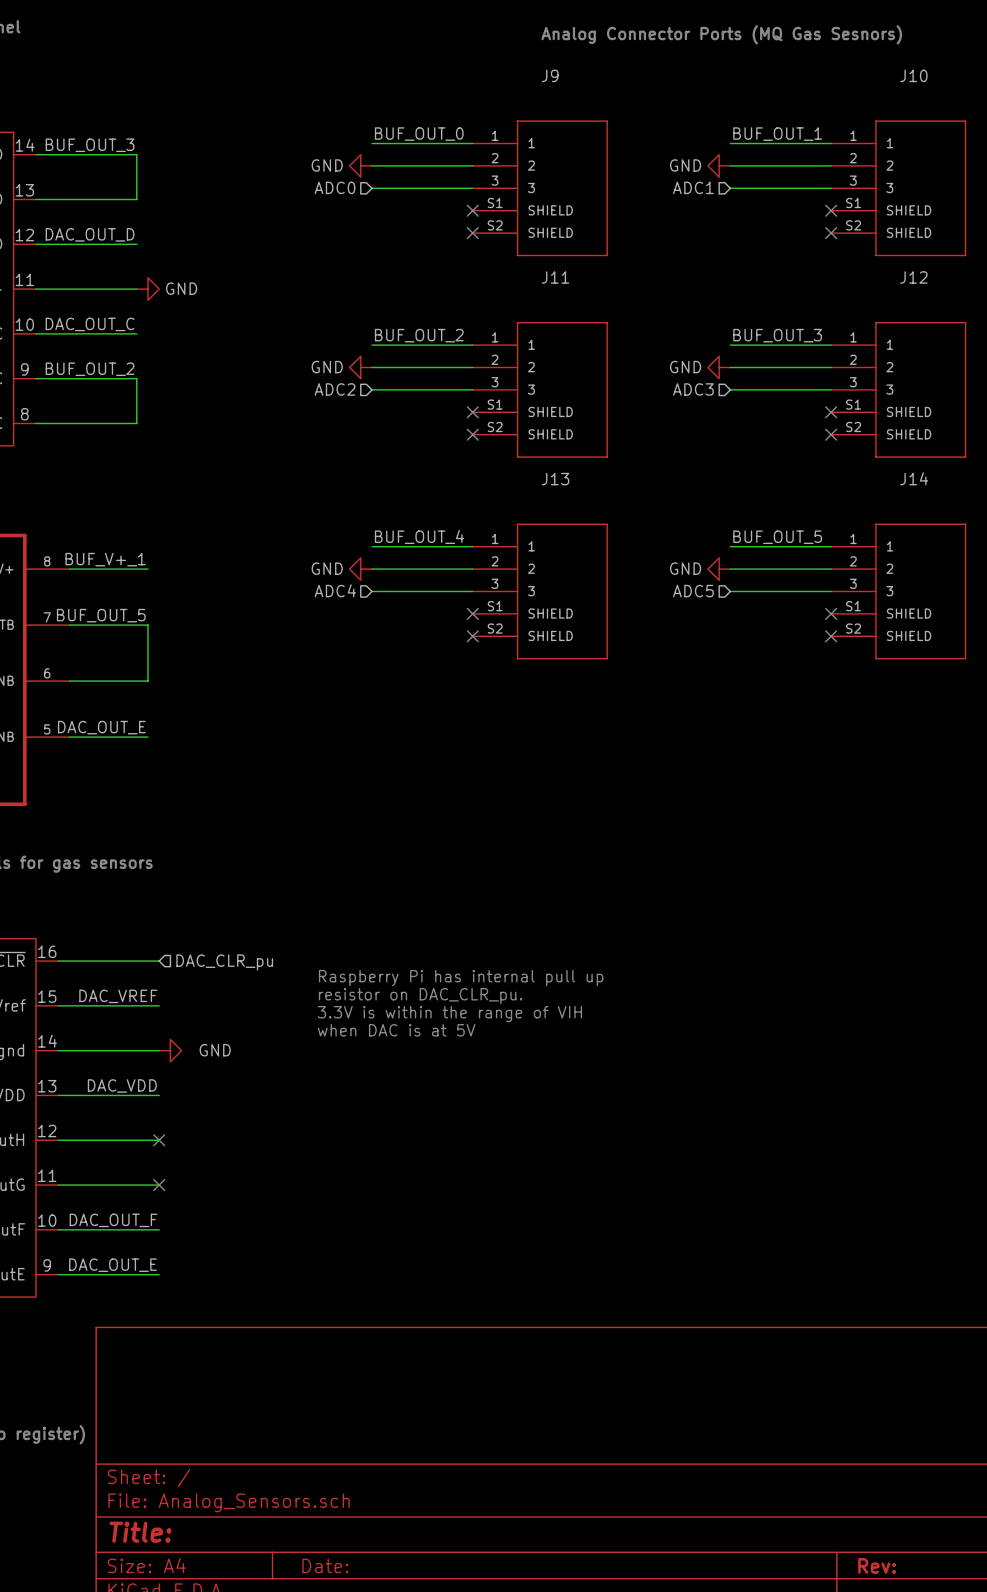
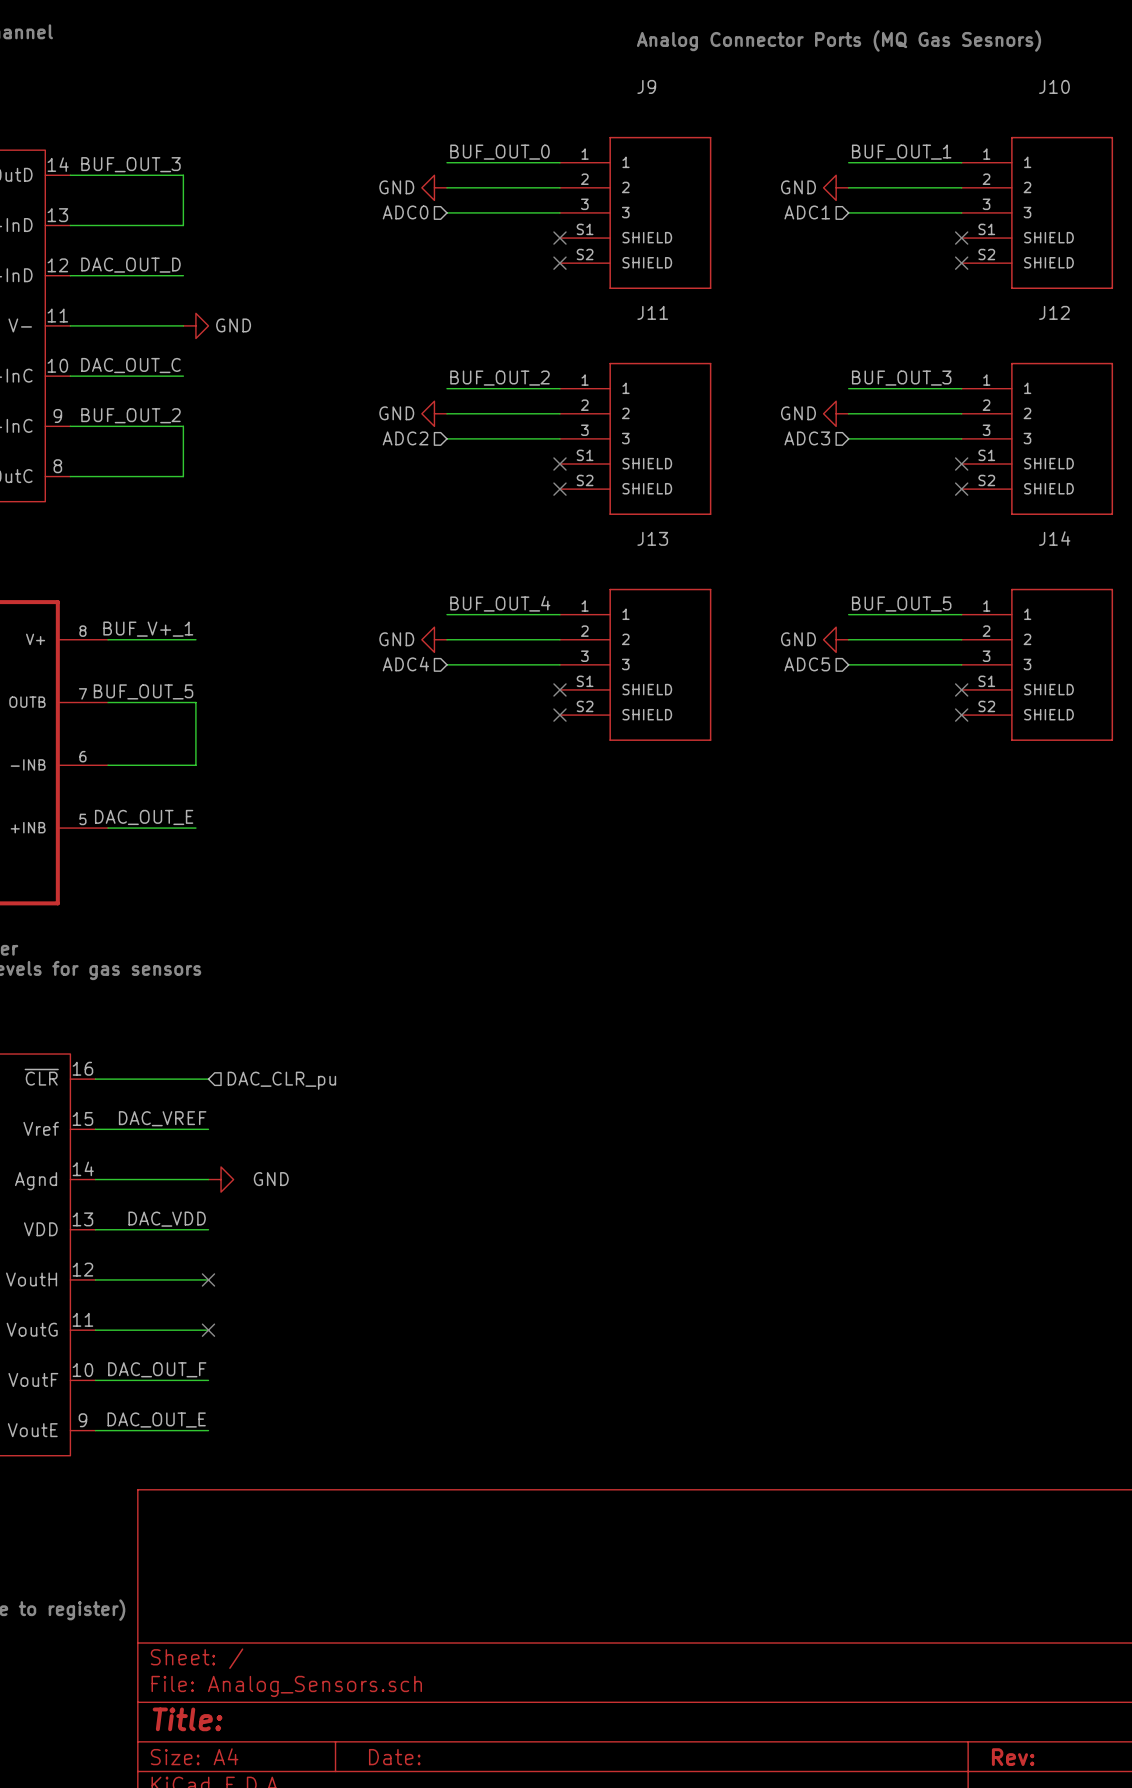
text: Raspberry Pi has internal pull up (461, 978) -> none
text: resistor on DAC_CLR_pu. (420, 996) -> none
text: 3.3V is within the range of VIH (449, 1014) -> none
text: when DAC is at 5V (396, 1030) -> none

